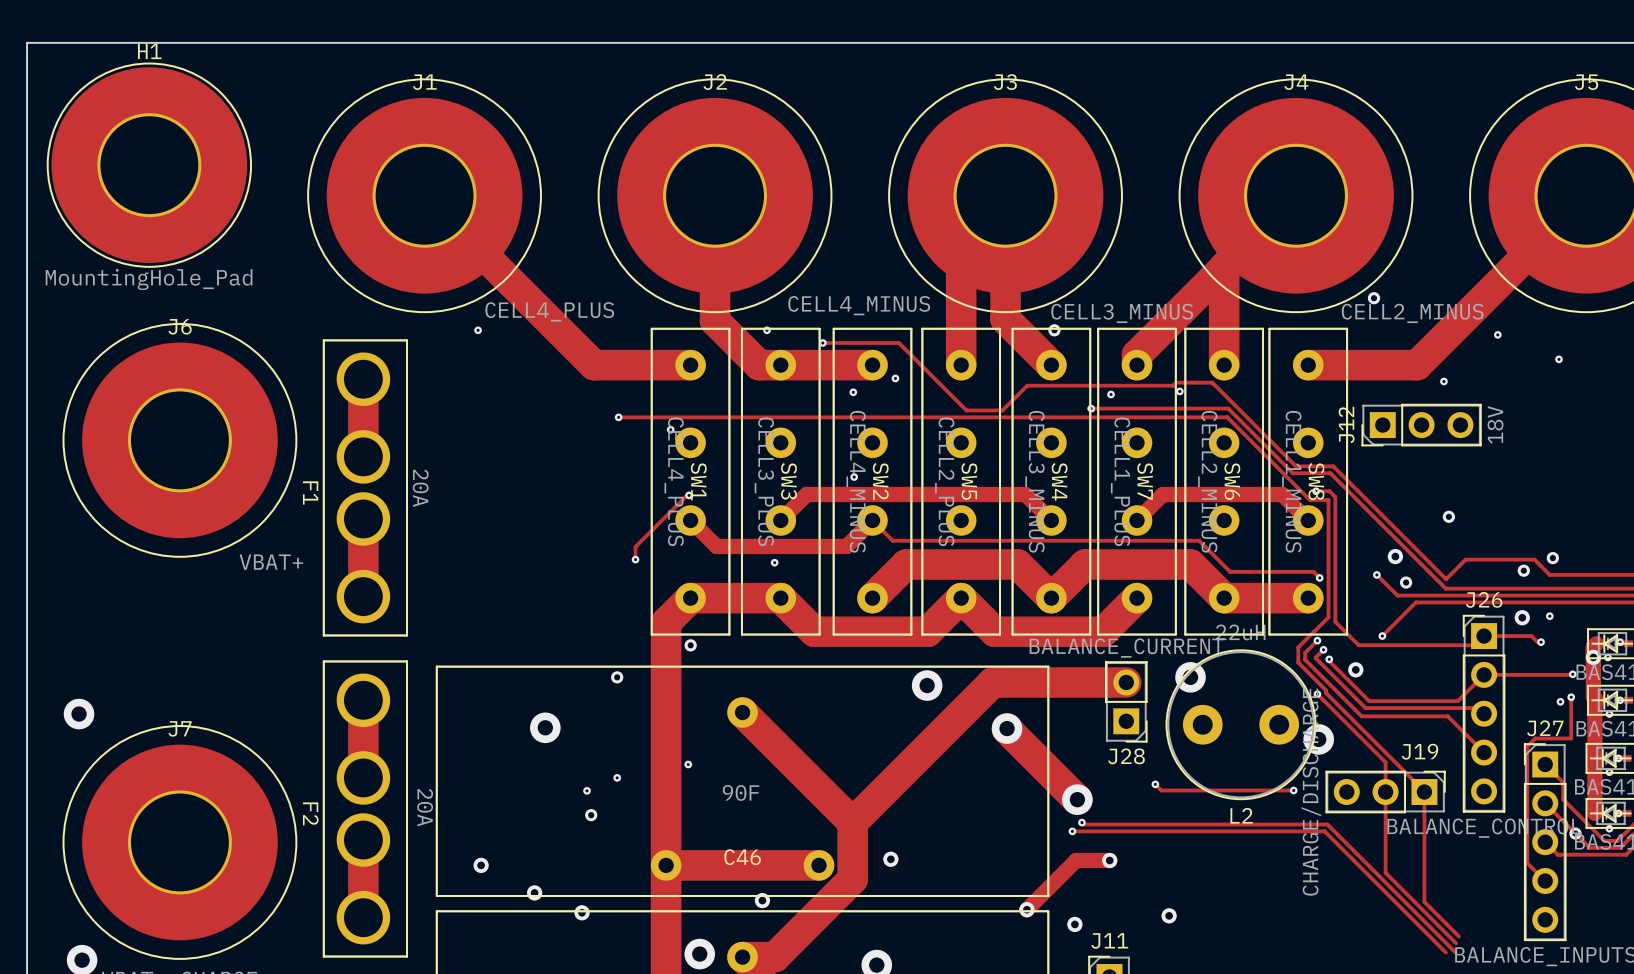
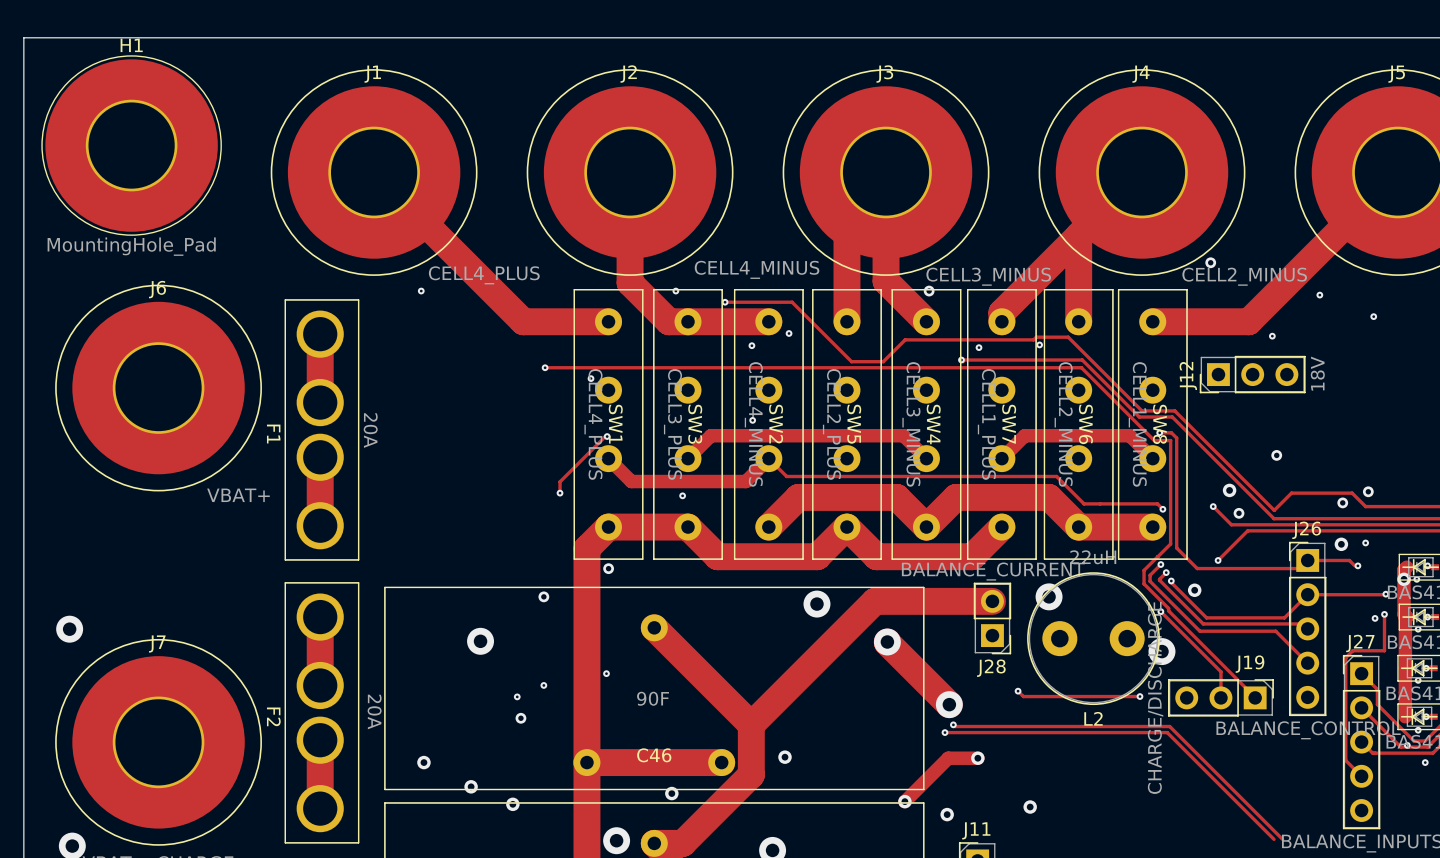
track: (1385, 792) (1385, 872) (1456, 943) -> none
track: (1424, 792) (1424, 901) (1458, 936) -> none
via: (1575, 833) -> none
via: none -> (1407, 745)
via: none -> (1425, 762)

